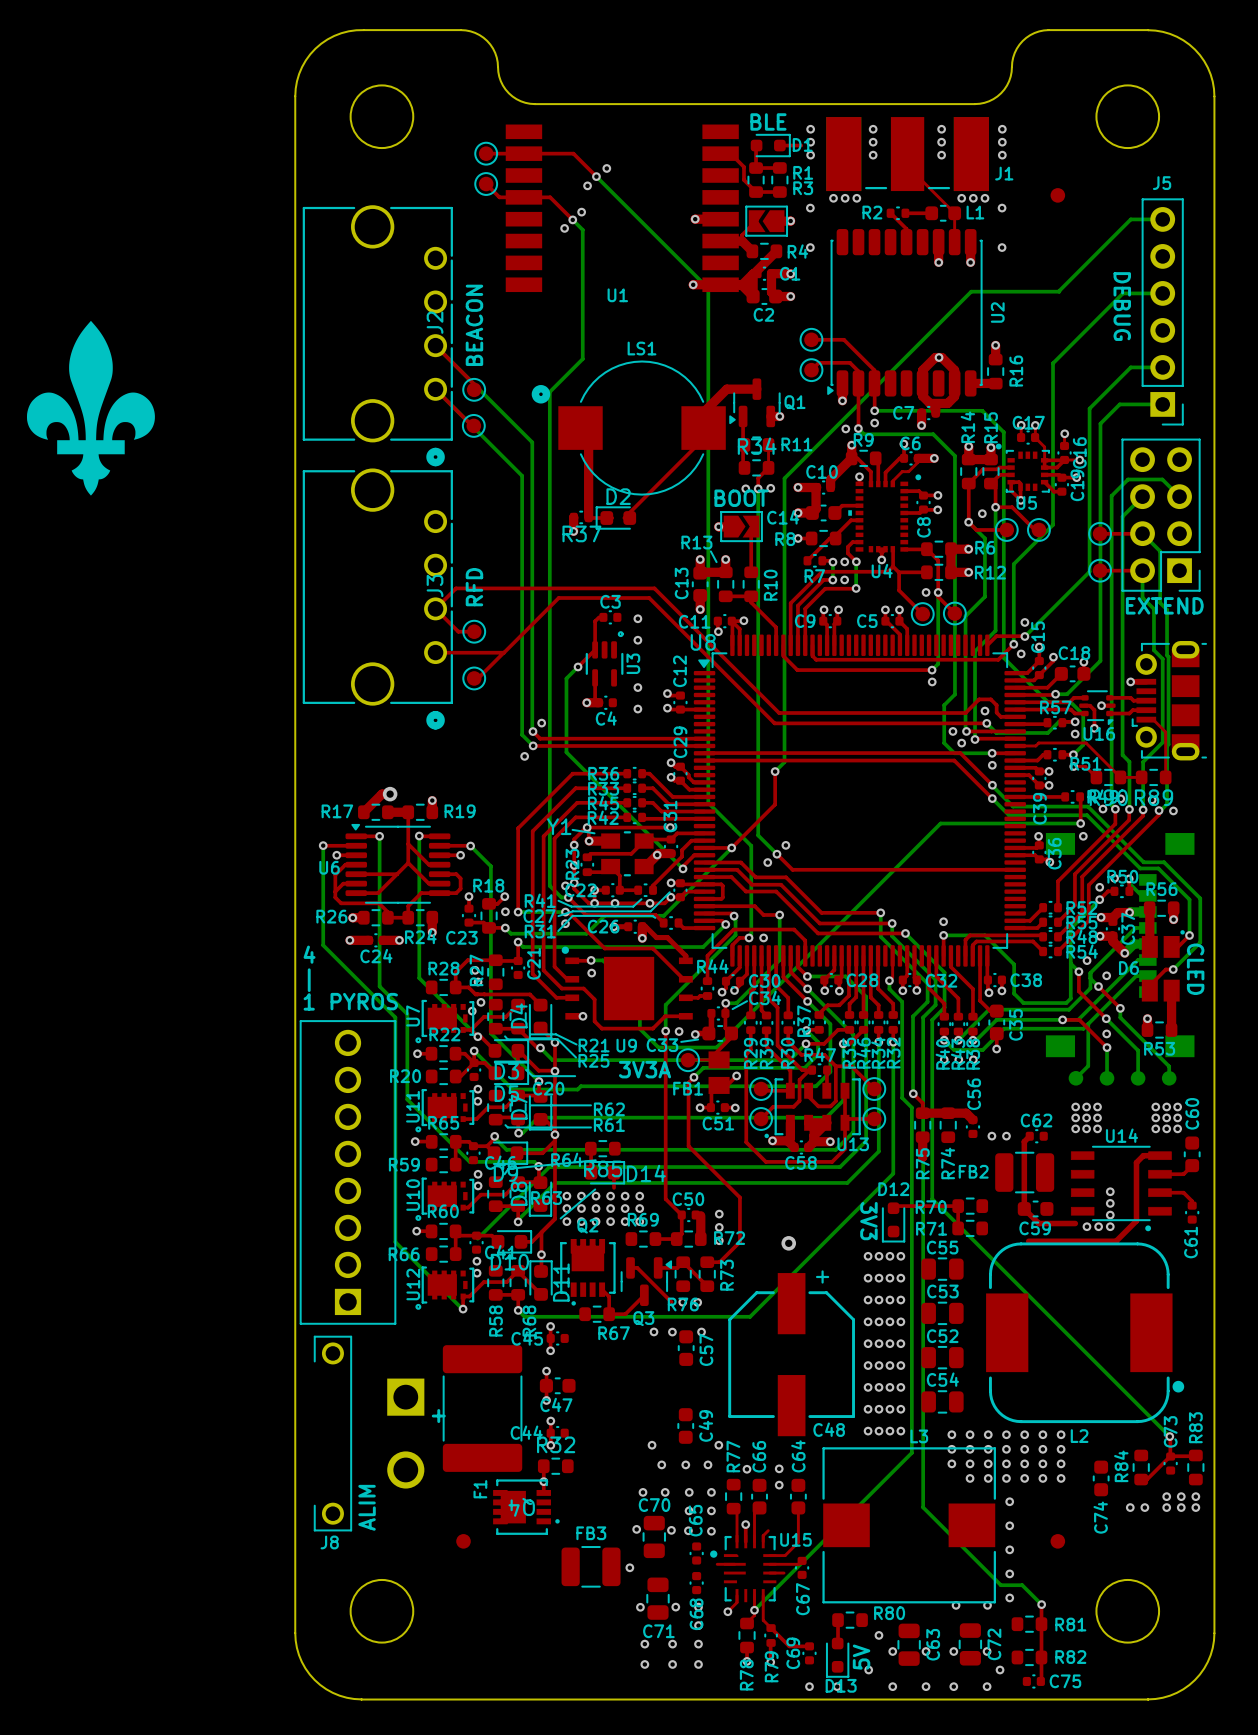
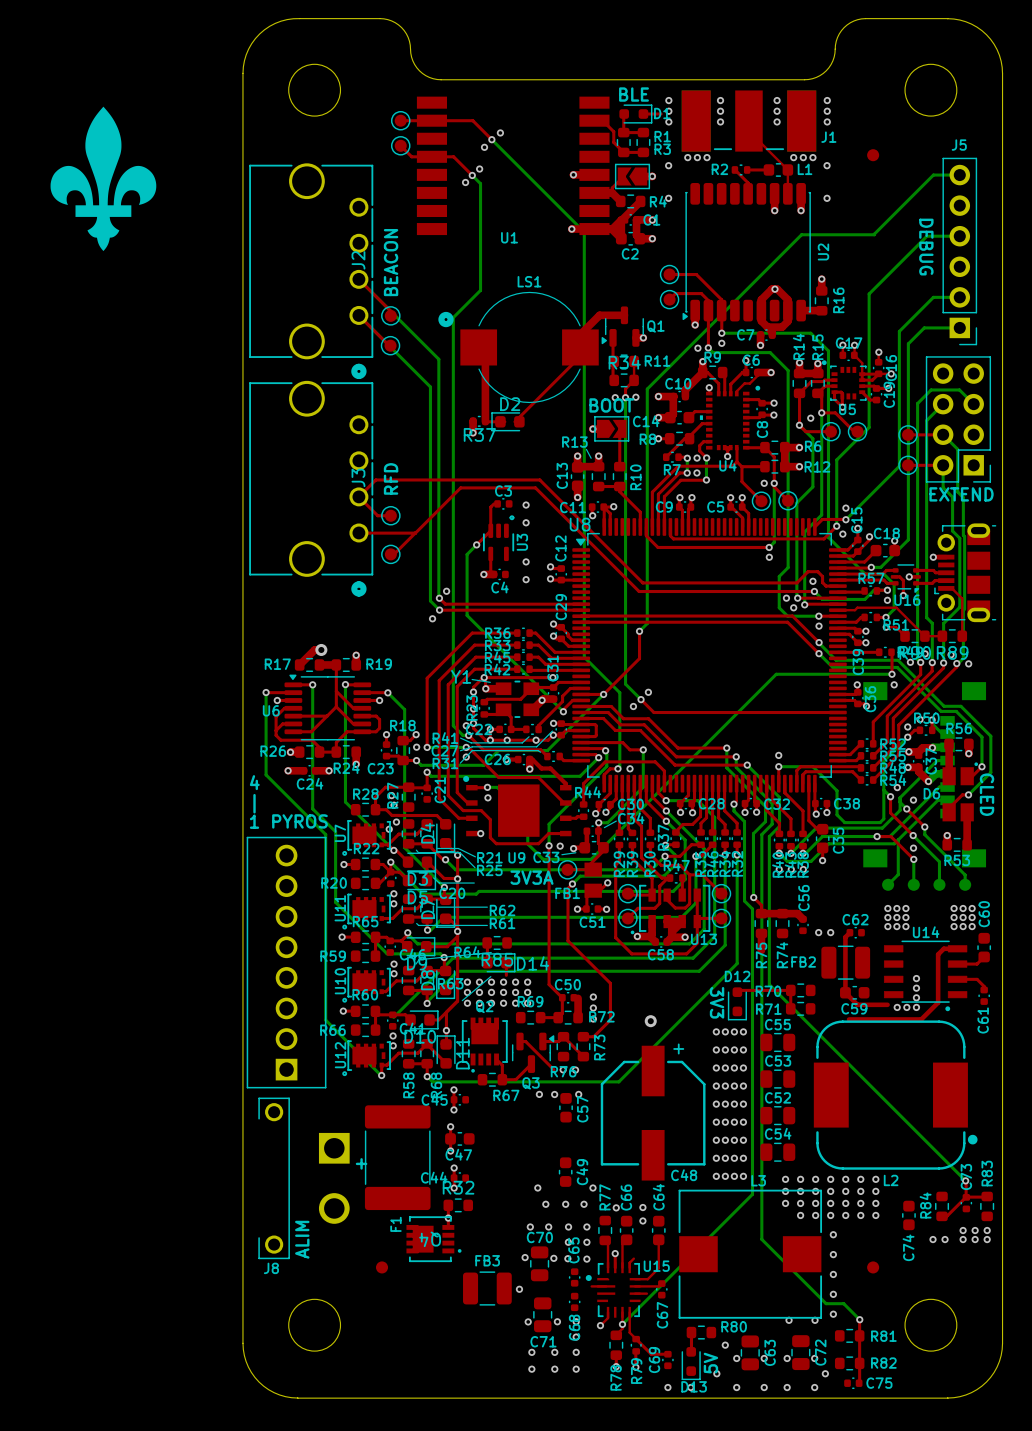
drawing position: (90, 408) -> (103, 178)

